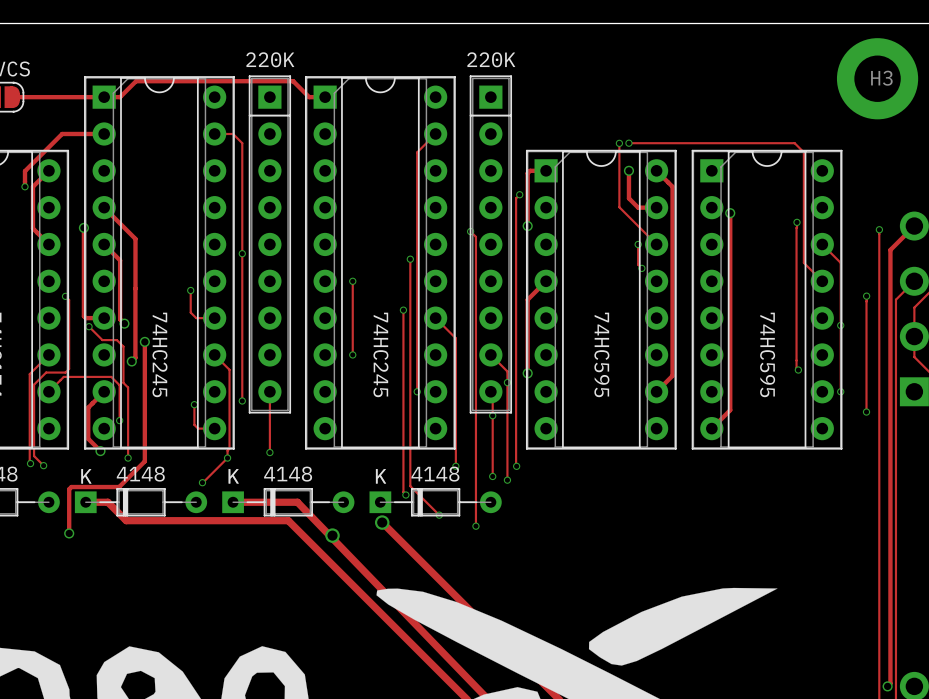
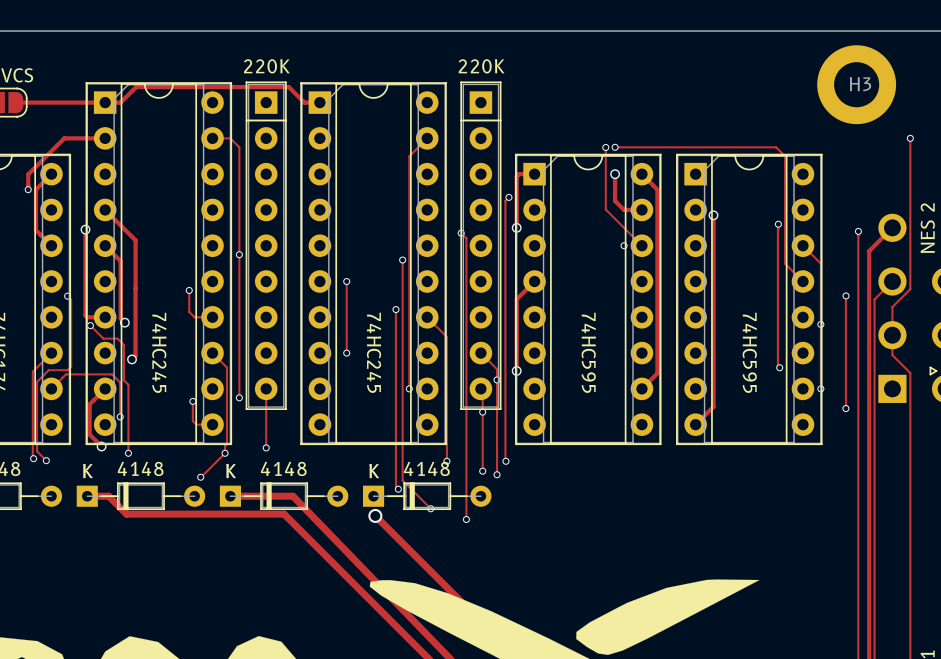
track: (638, 244) (638, 264) (641, 268) -> none
via: (641, 268) -> none
track: (144, 341) (144, 461) (119, 487) (71, 487) (69, 489) (69, 533) -> none
via: (144, 341) -> none
via: (69, 533) -> none
via: (332, 535) -> none

